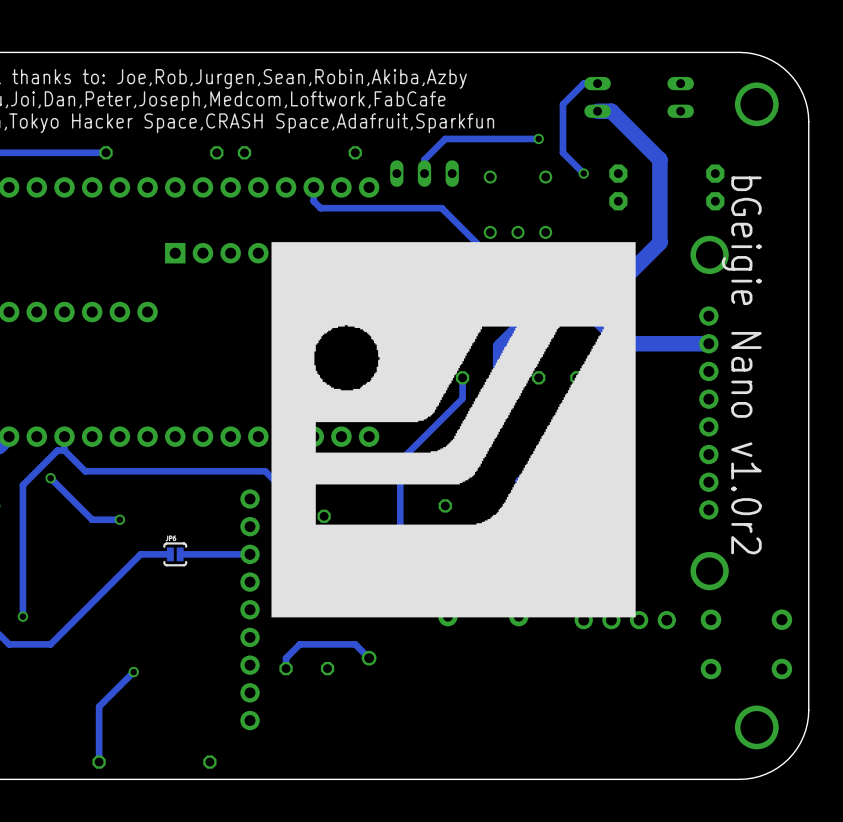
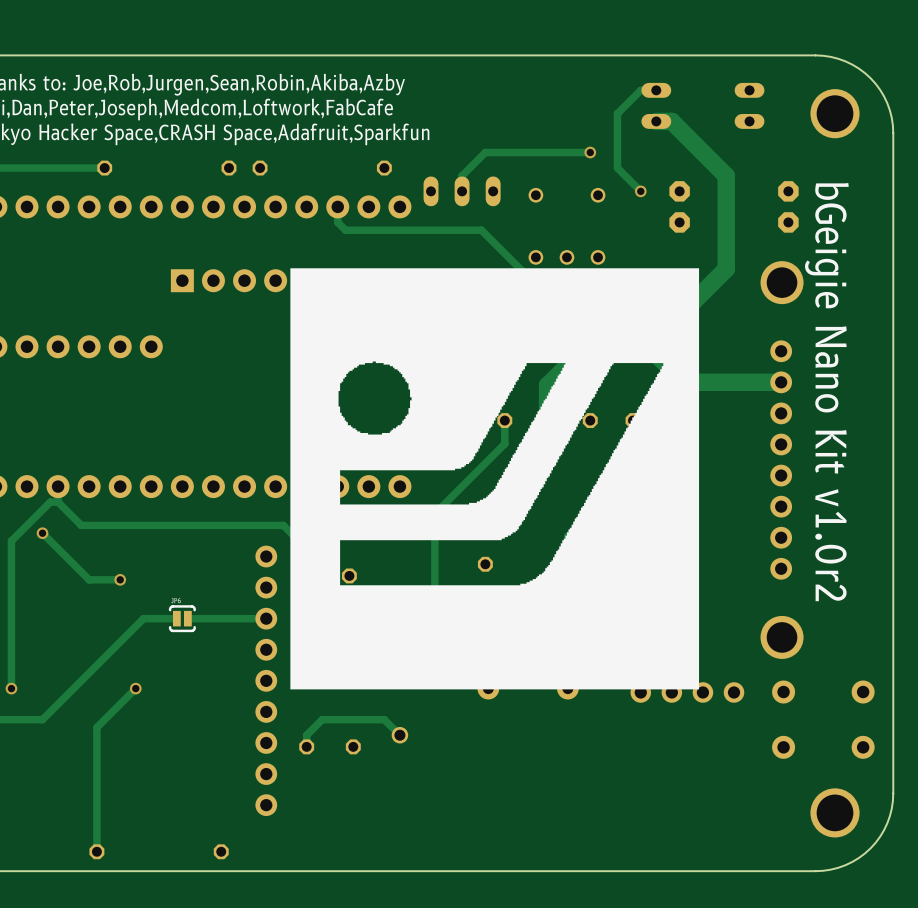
text: bGeigie Nano v1.0r2 (741, 365) -> bGeigie Nano Kit v1.0r2 (826, 392)
track: (133, 672) (99, 706) -> (135, 688) (96, 727) (96, 789)
via position: (133, 672) -> (135, 688)

